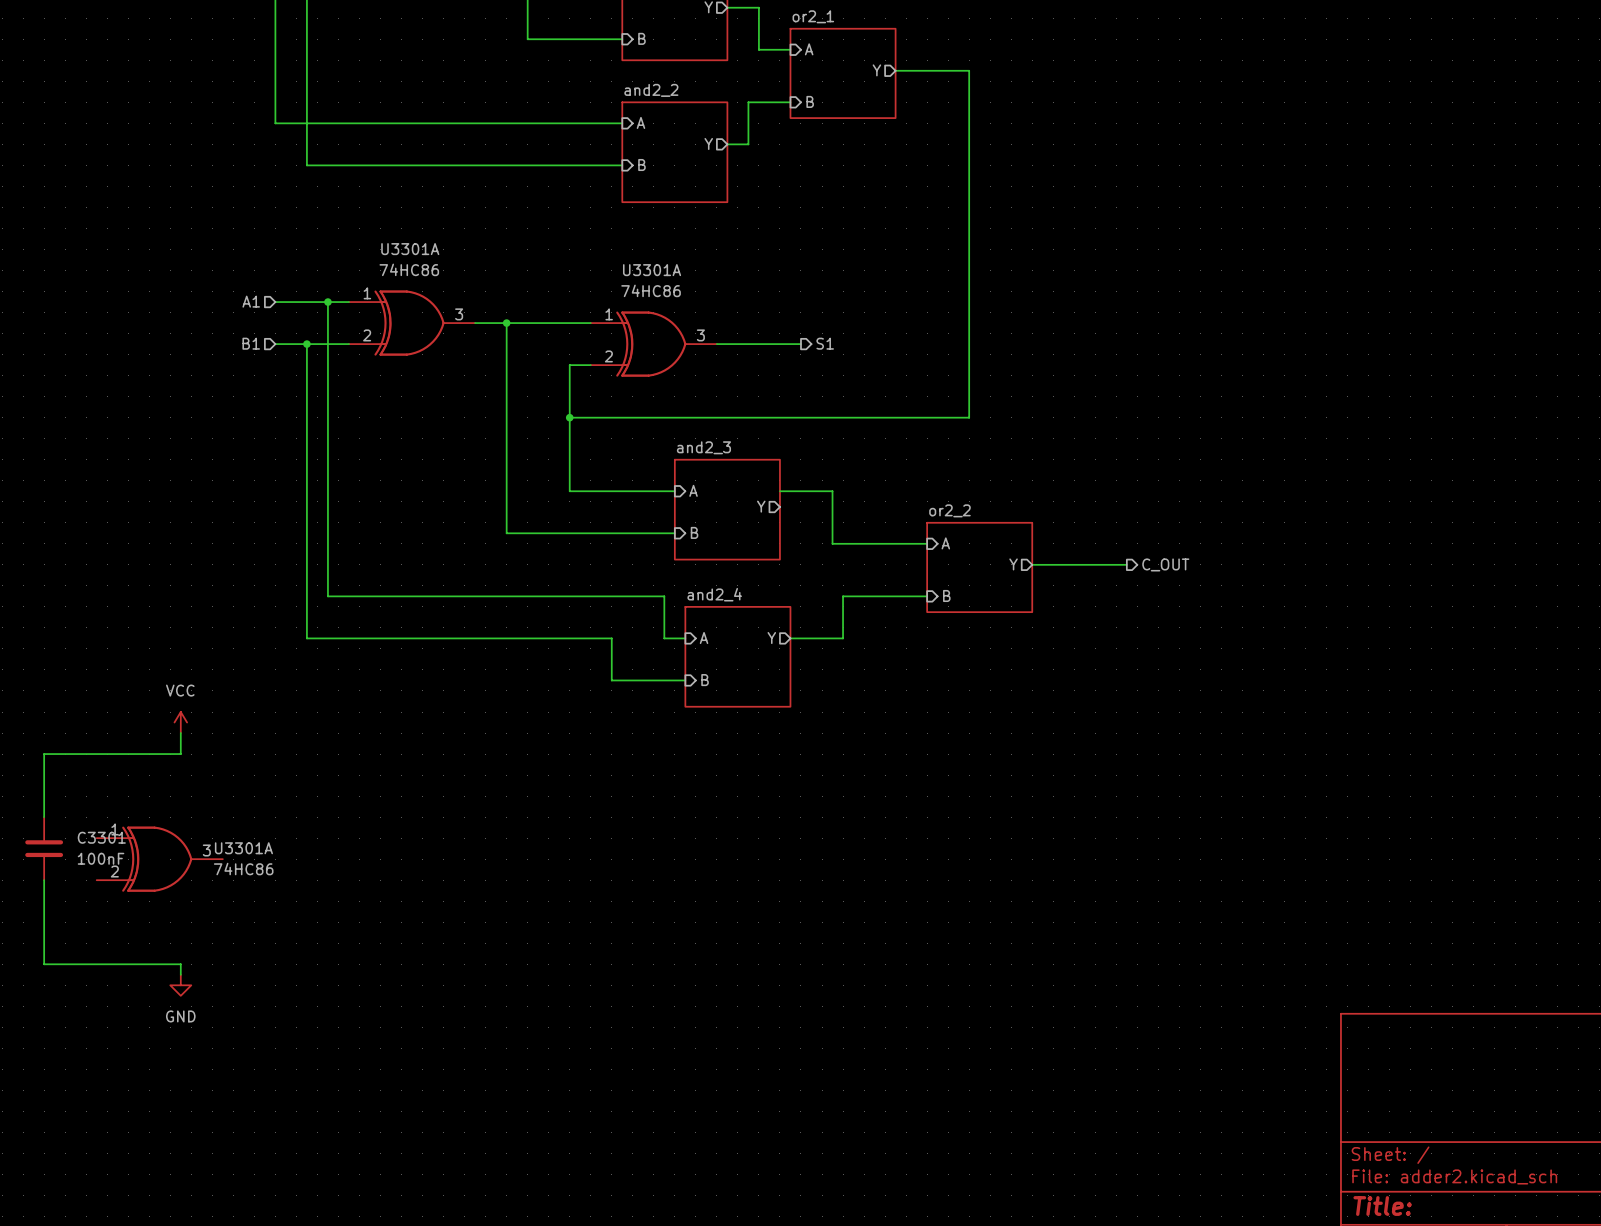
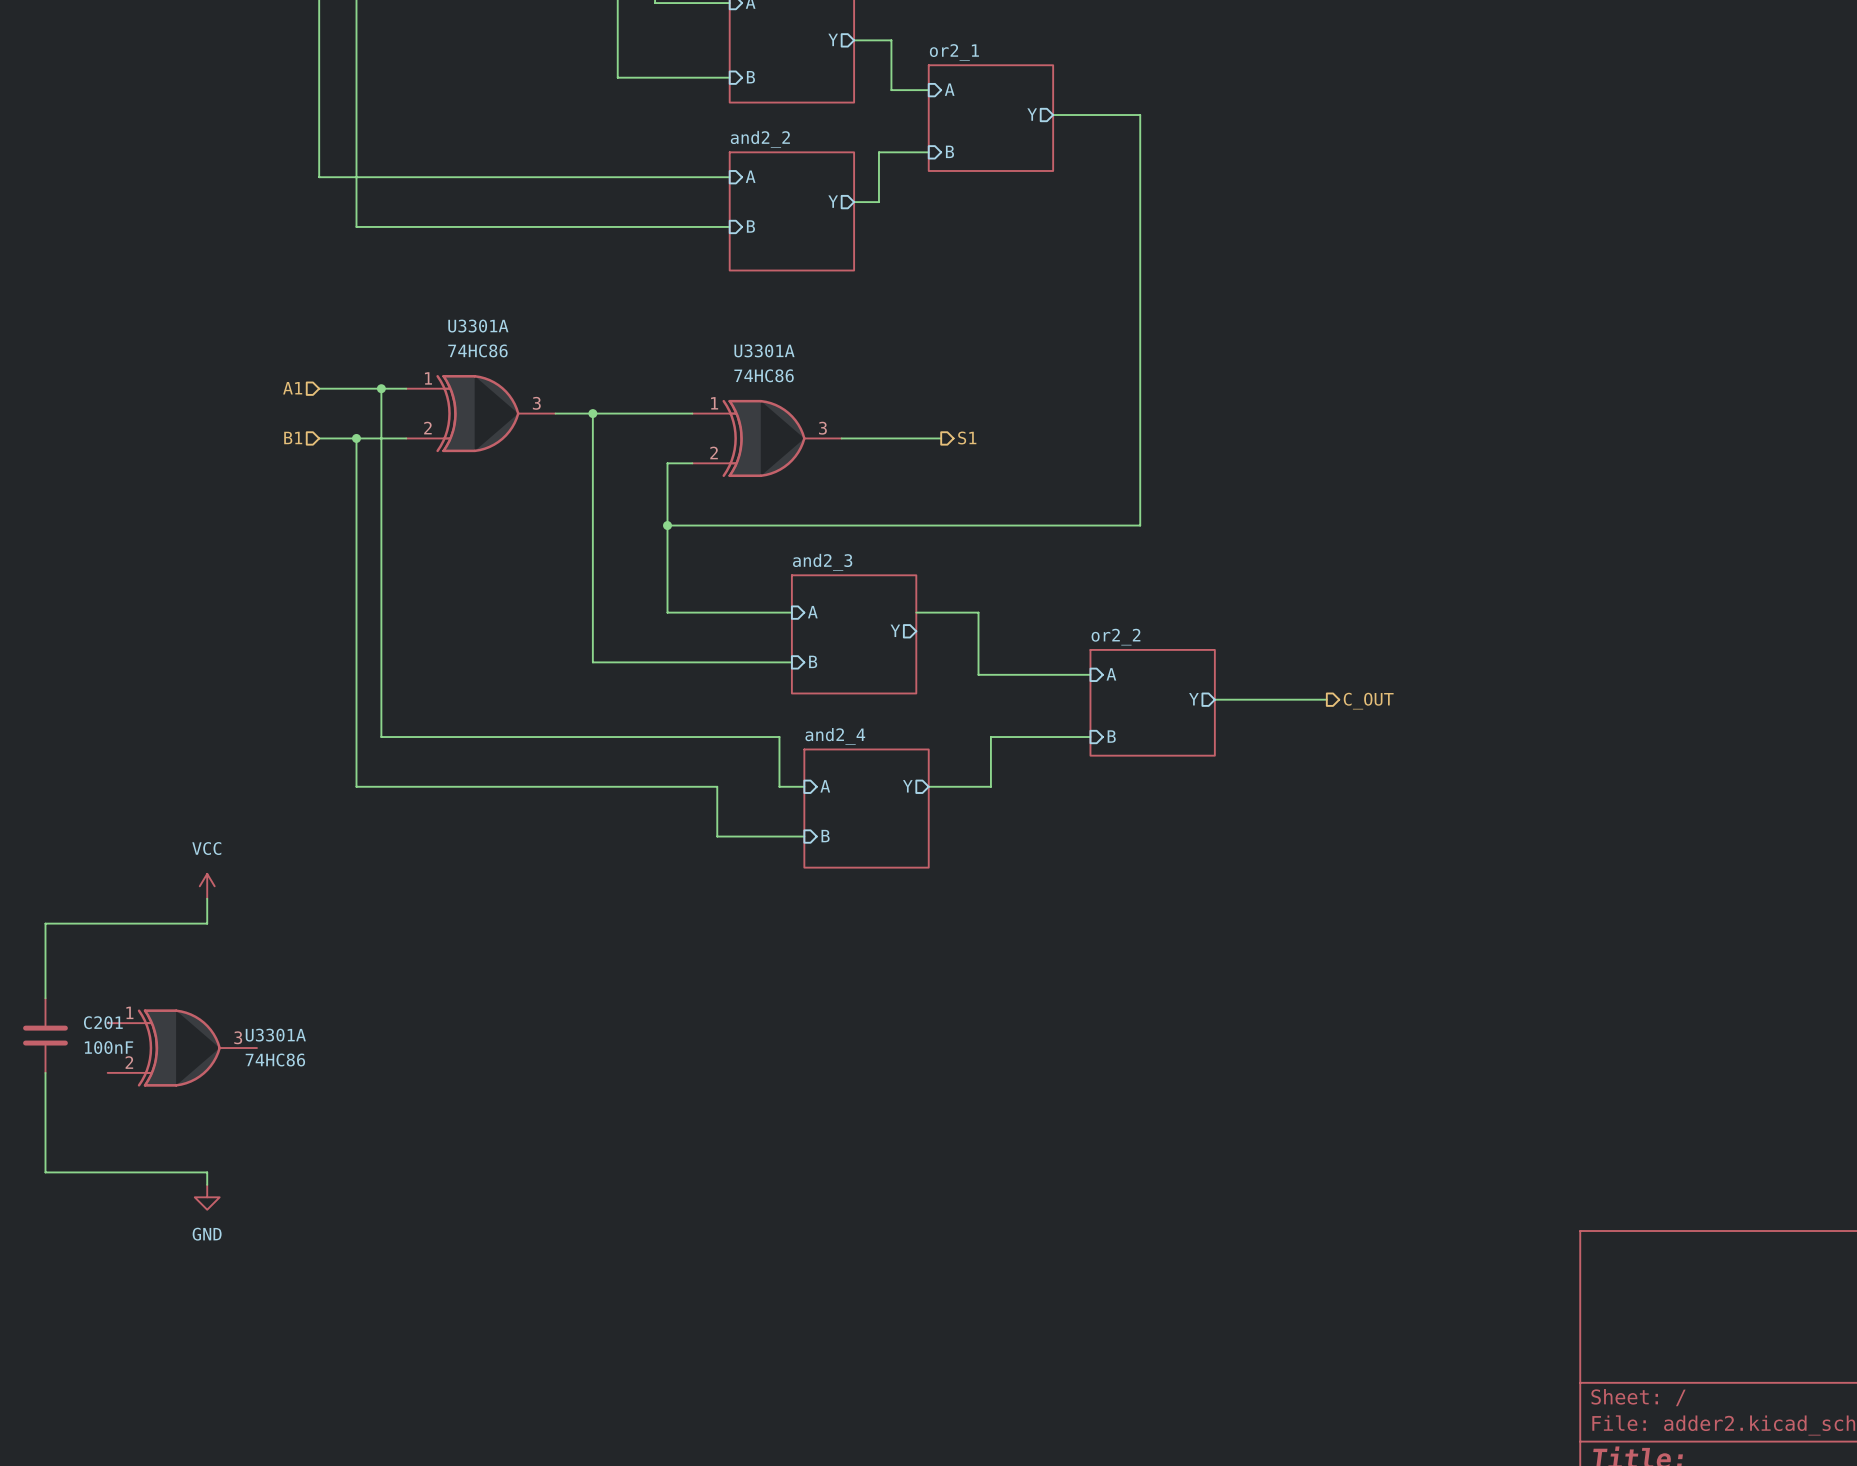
C3301 name: C3301 (101, 837) -> C201 (103, 1022)

